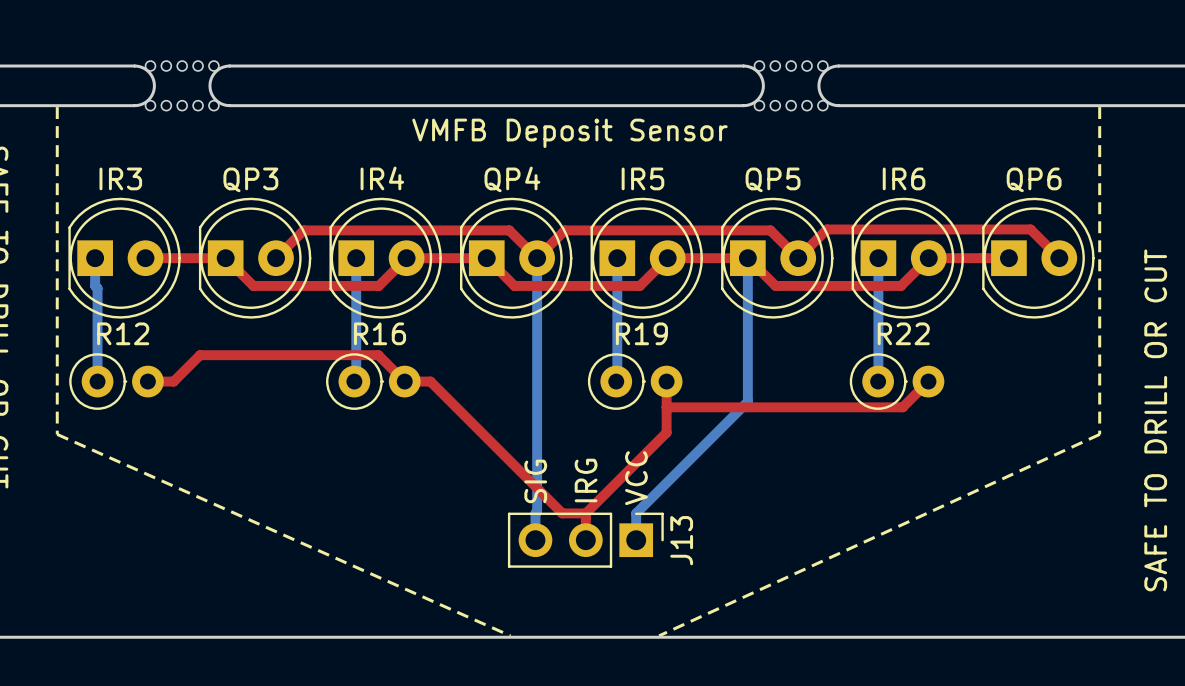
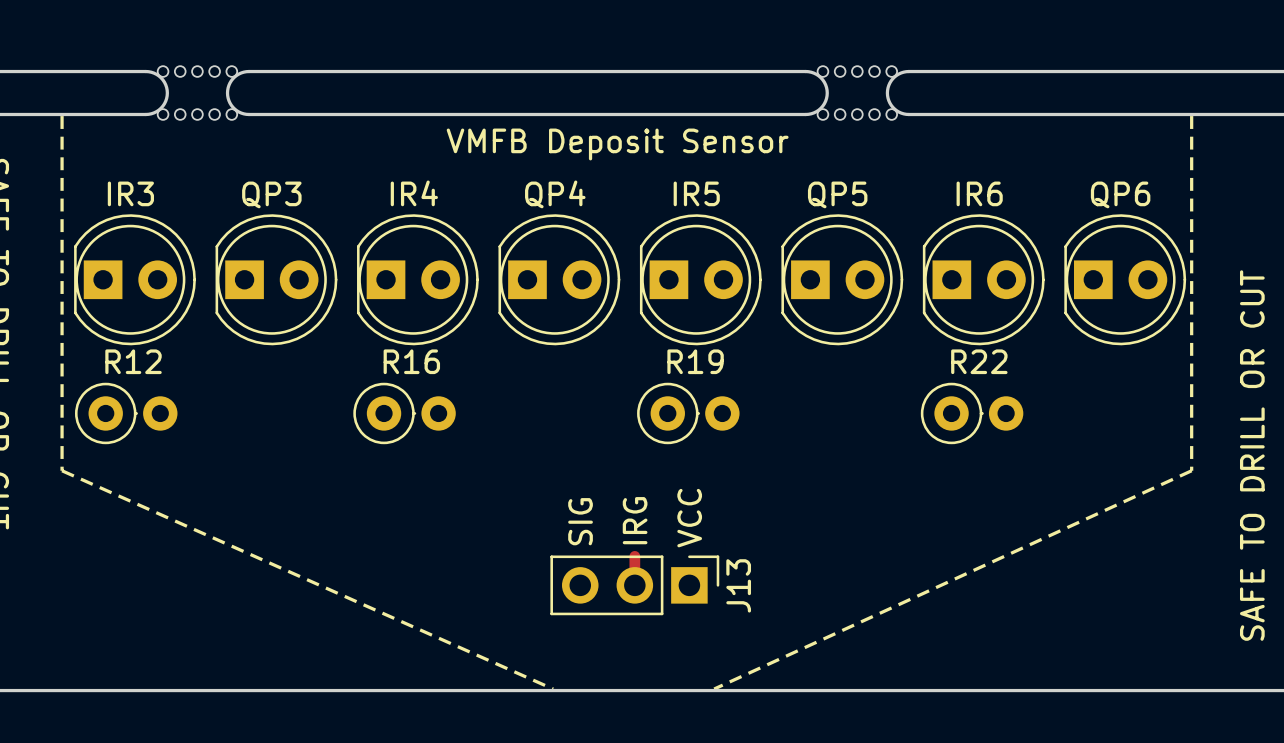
bottom track: (95, 258) (95, 285) (97, 288) (97, 381) -> none
top track: (145, 258) (225, 258) (253, 285) (378, 285) (406, 258) (486, 258) (514, 285) (639, 285) (667, 258) (747, 258) (775, 285) (901, 285) (928, 258) (1008, 258) -> none
top track: (276, 258) (303, 230) (509, 230) (537, 258) (564, 230) (770, 230) (798, 258) (826, 229) (1030, 229) (1059, 258) -> none
bottom track: (356, 258) (356, 379) (354, 381) -> none
bottom track: (537, 258) (535, 540) -> none
bottom track: (617, 258) (616, 381) -> none
bottom track: (747, 258) (747, 401) (636, 513) (636, 540) -> none
bottom track: (878, 258) (878, 381) -> none
top track: (147, 381) (173, 381) (200, 355) (378, 355) (404, 381) (430, 381) (562, 513) (585, 513) (666, 432) (666, 381) -> none
top track: (928, 381) (902, 407) (666, 407) -> none

